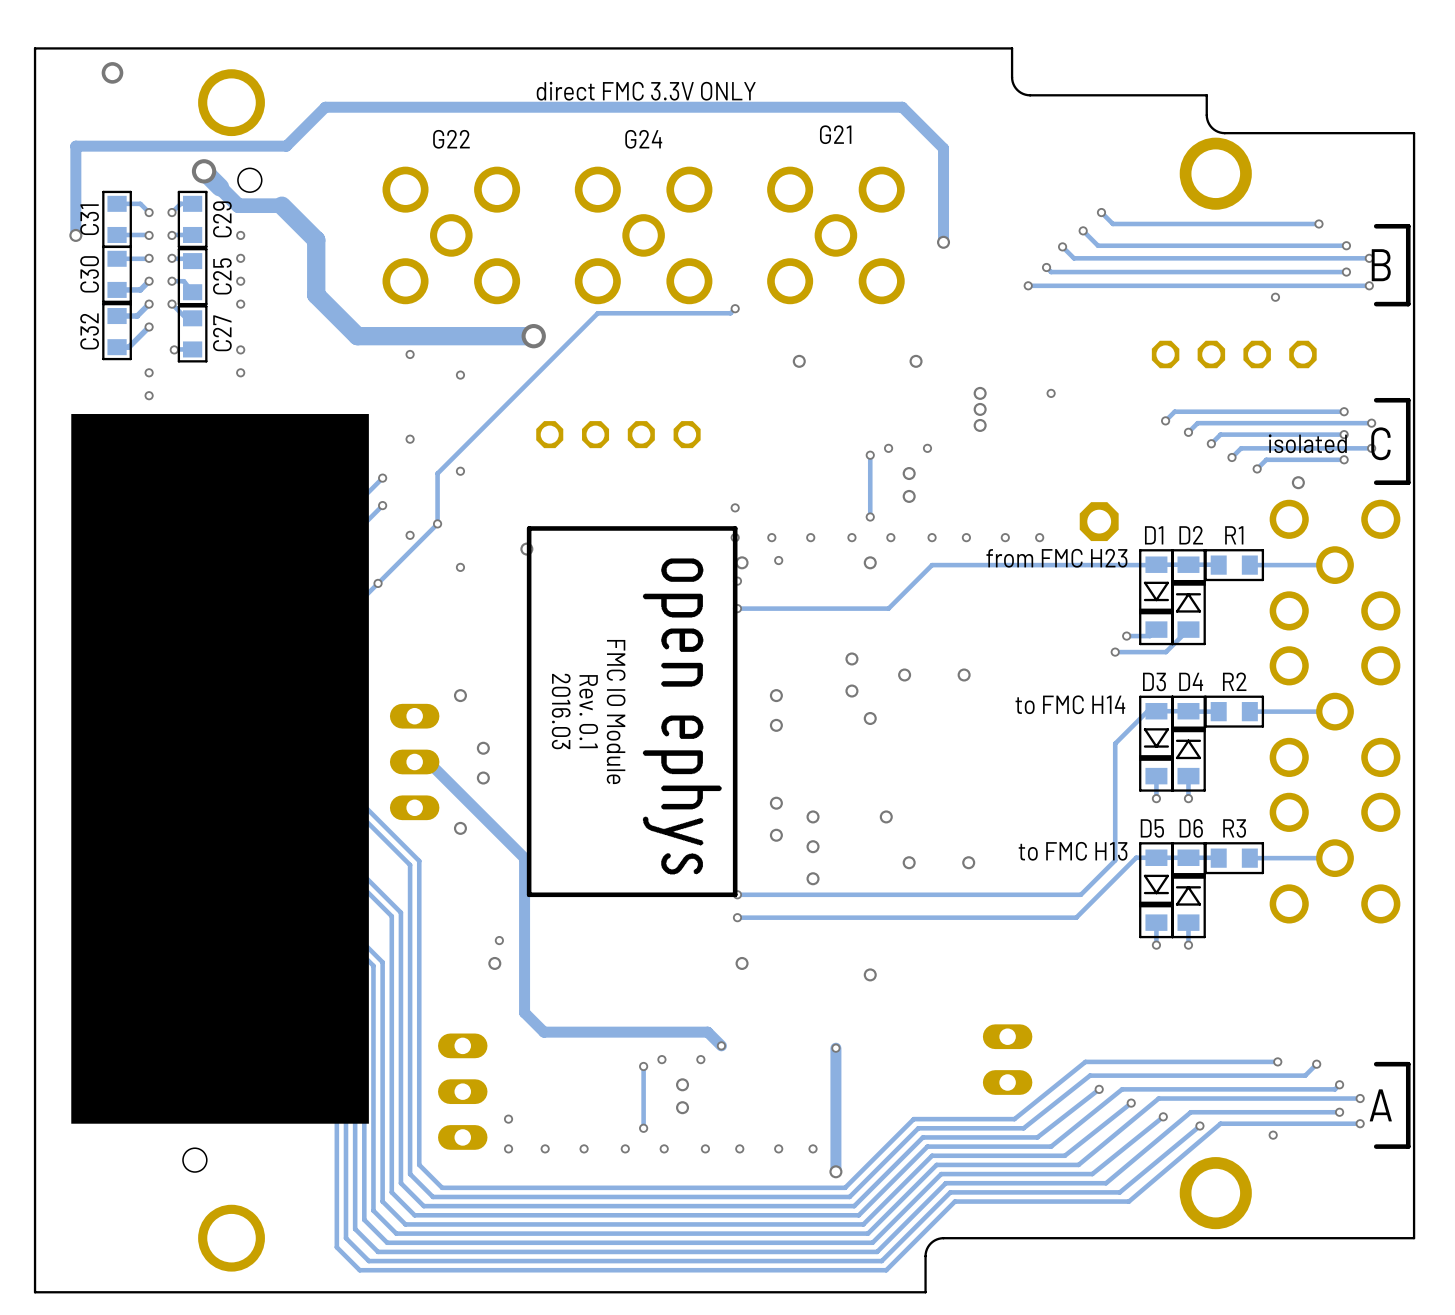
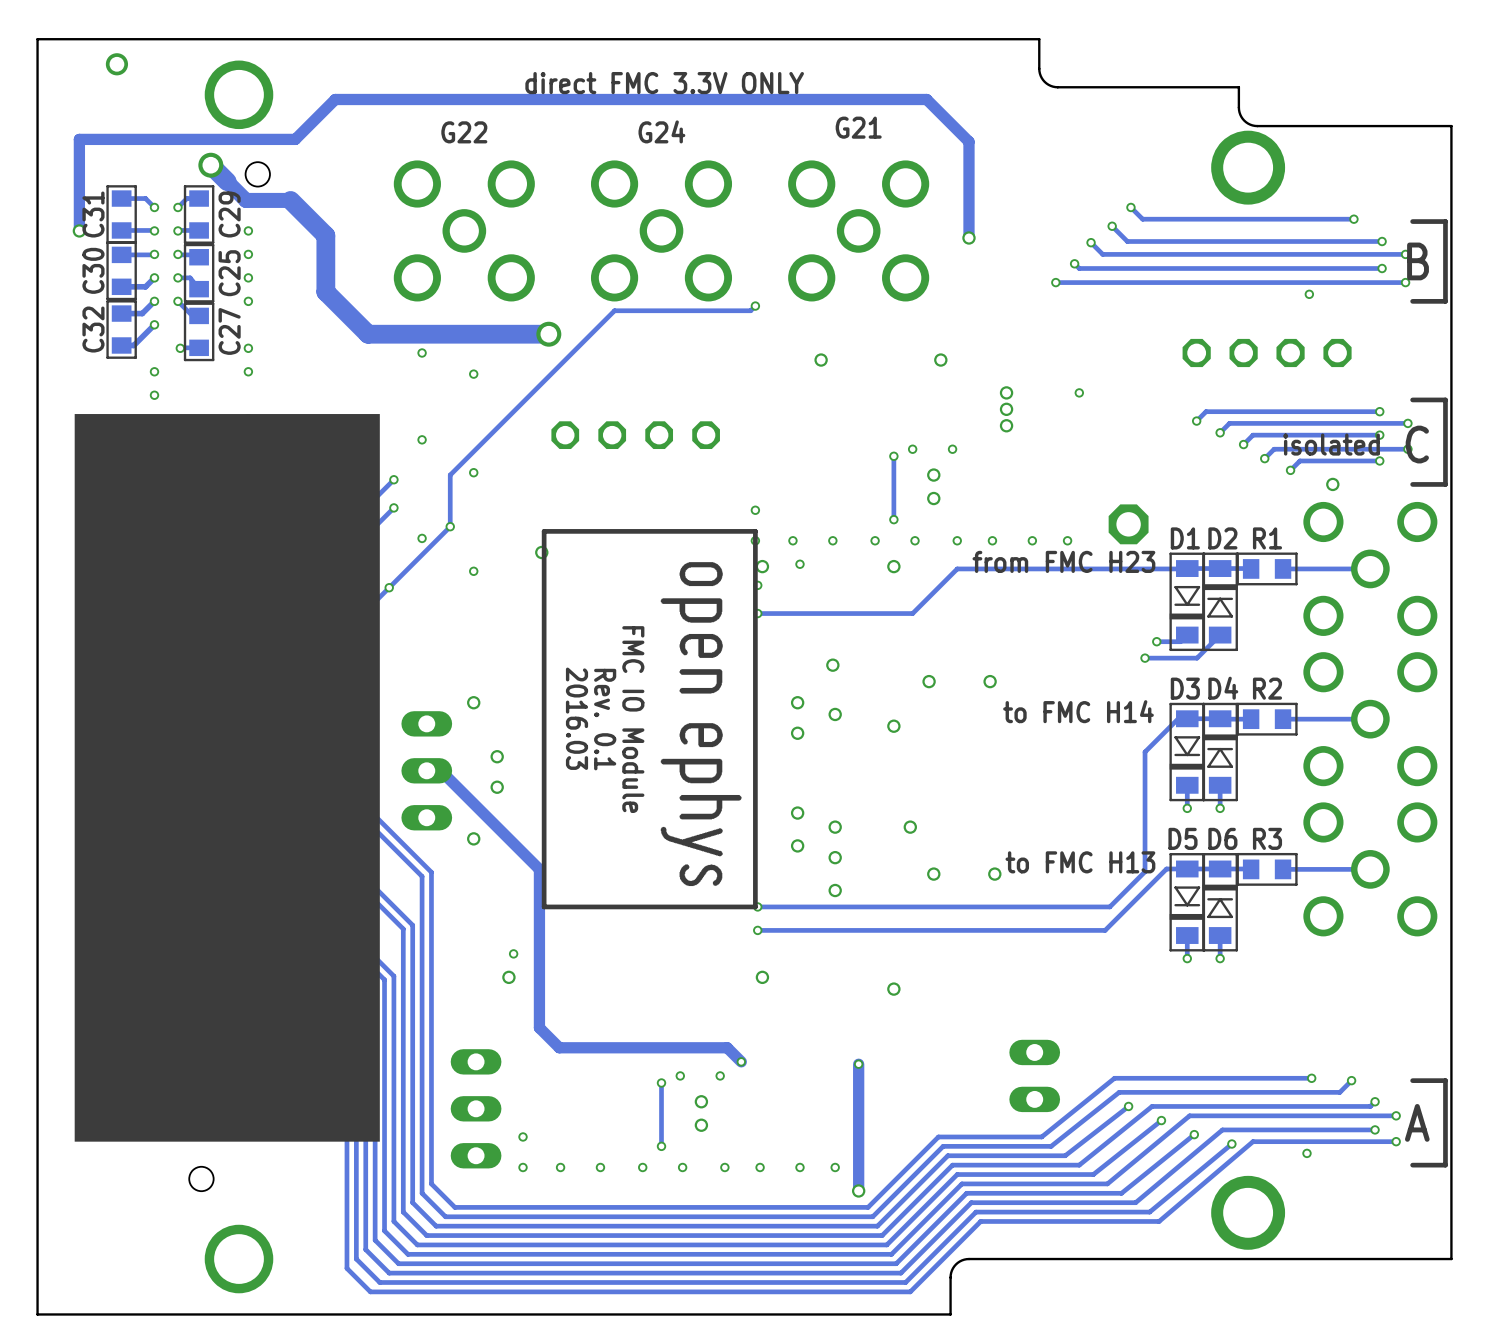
via: none -> (832, 665)
via: (851, 658) -> none
via: (851, 691) -> none
via: none -> (835, 714)

